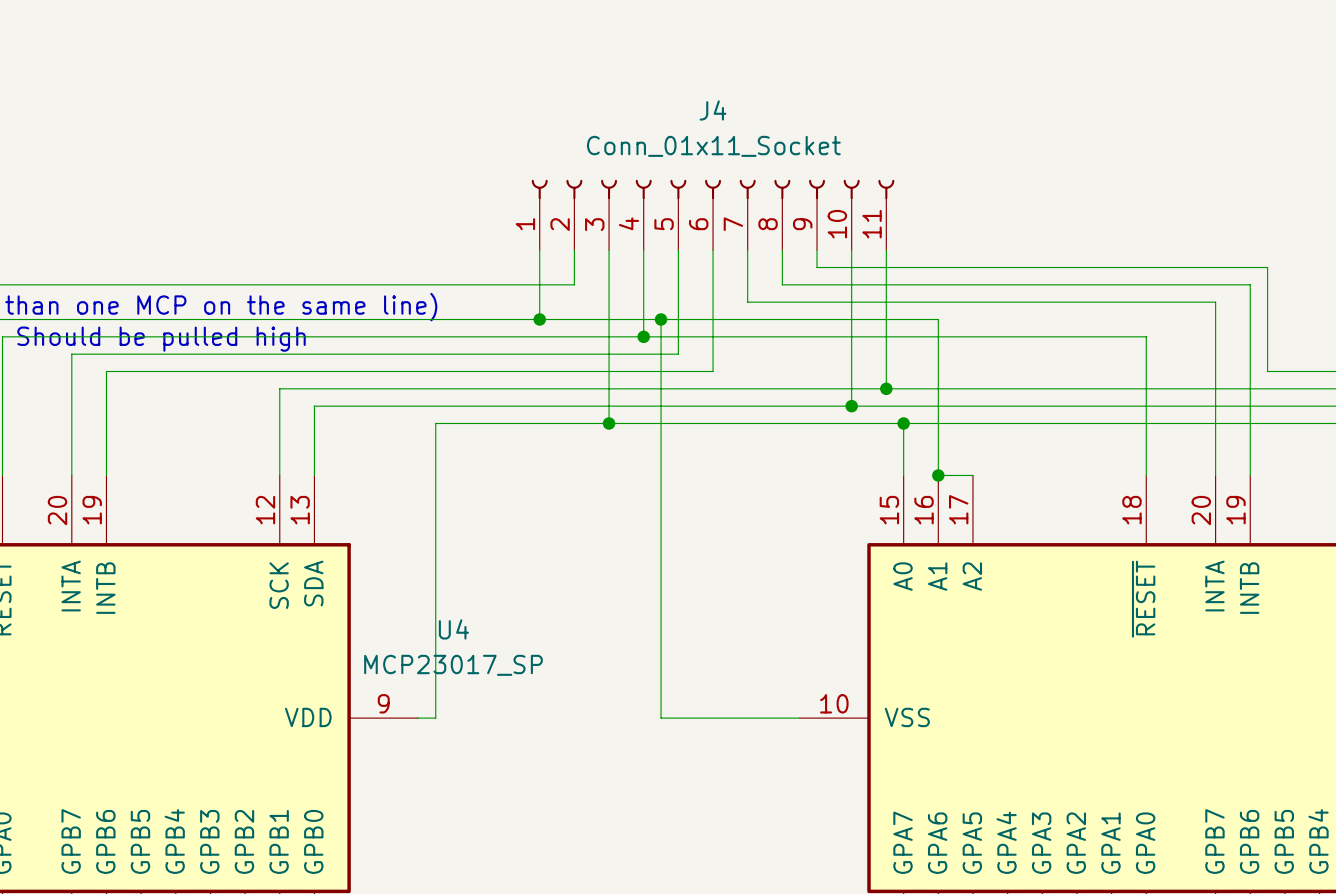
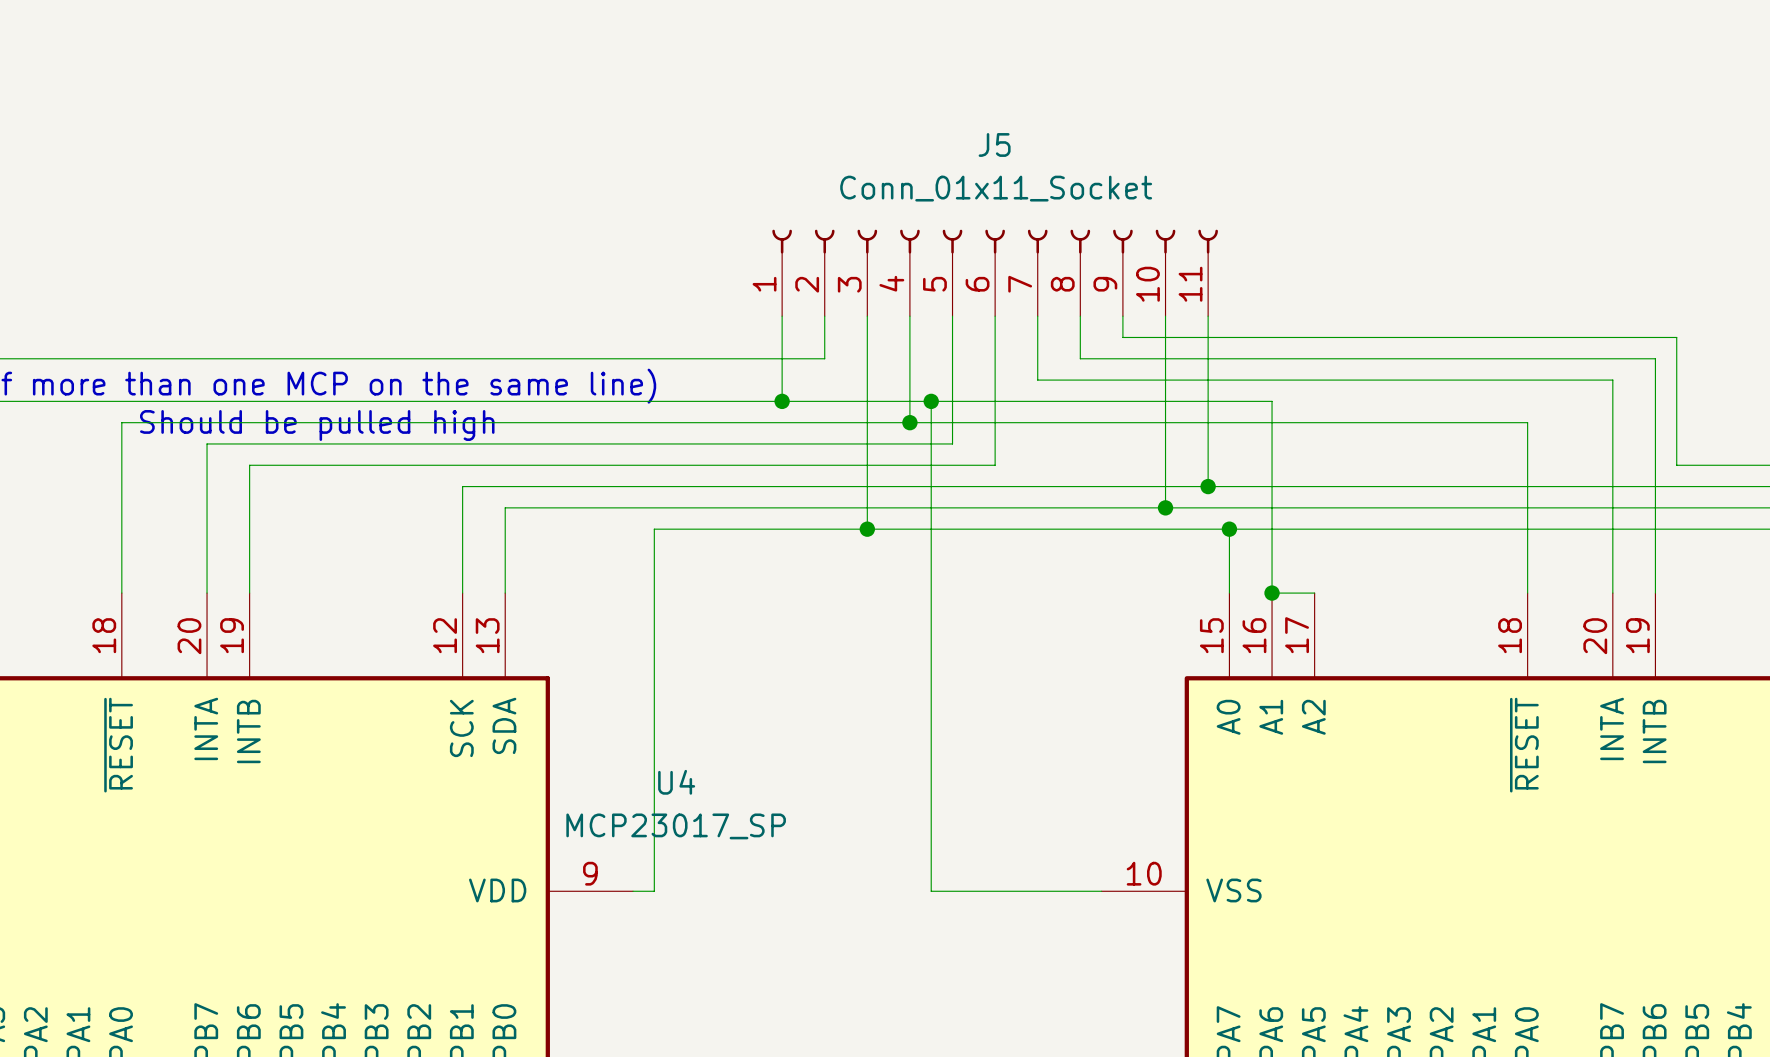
J4 name: J4 (713, 110) -> J5 (994, 144)

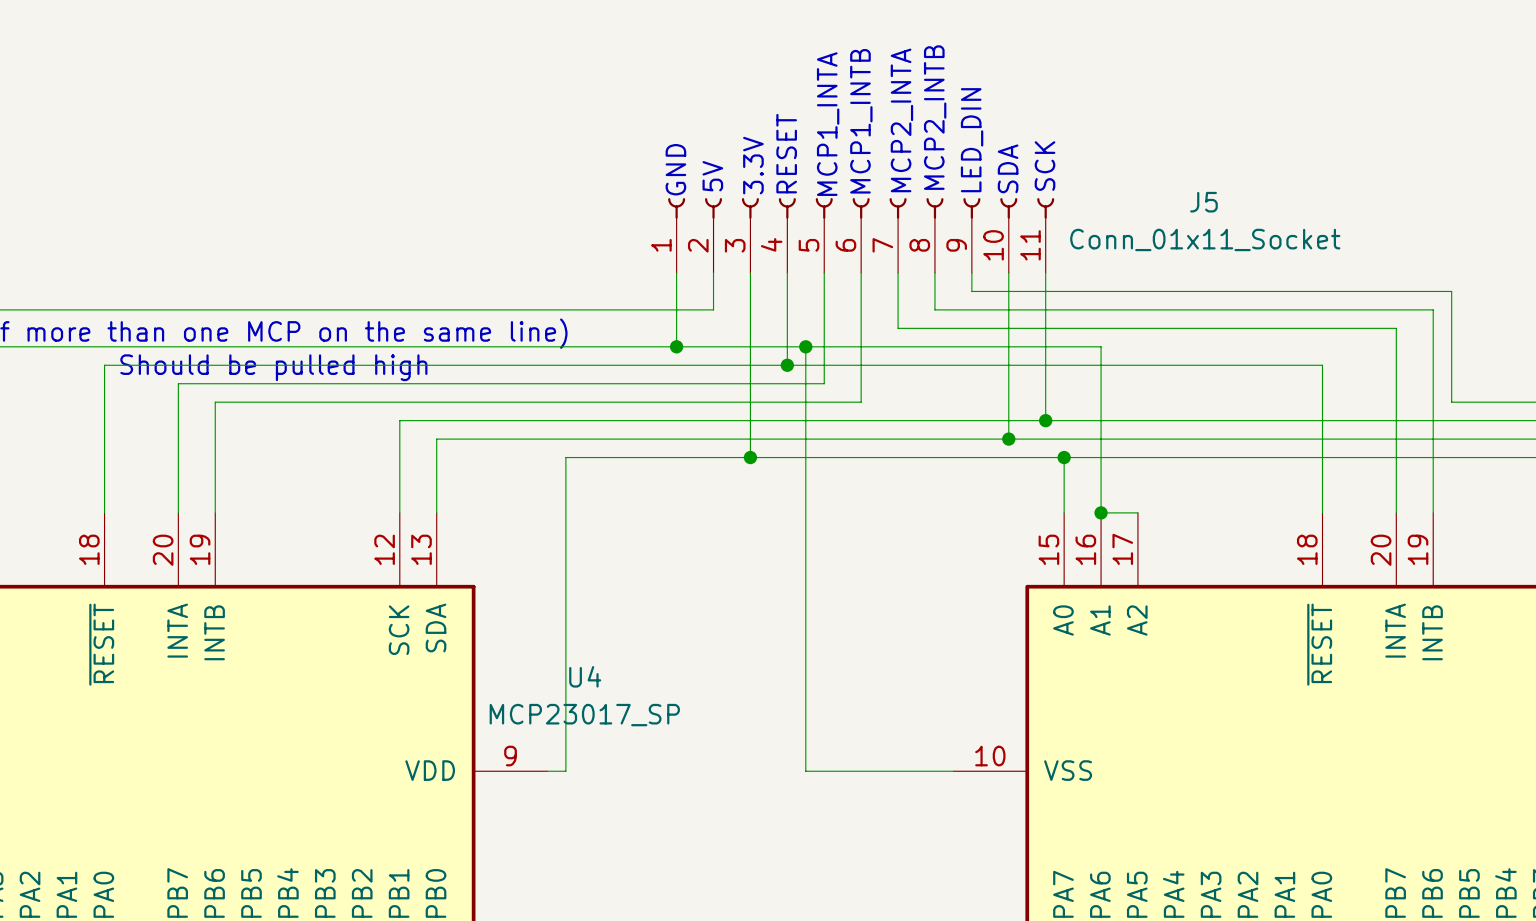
text: none -> MCP2_INTB (935, 117)
text: none -> MCP2_INTA (901, 120)
text: none -> MCP1_INTB (861, 121)
text: none -> MCP1_INTA (828, 124)
J5 name position: J5 (994, 144) -> J5 (1203, 202)
text: none -> LED_DIN (972, 140)
text: none -> RESET (786, 153)
J5 value position: Conn_01x11_Socket (996, 188) -> Conn_01x11_Socket (1205, 239)
text: none -> 3.3V (753, 165)
text: none -> SCK (1045, 166)
text: none -> SDA (1008, 168)
text: none -> GND (675, 169)
text: none -> 5V (712, 176)

